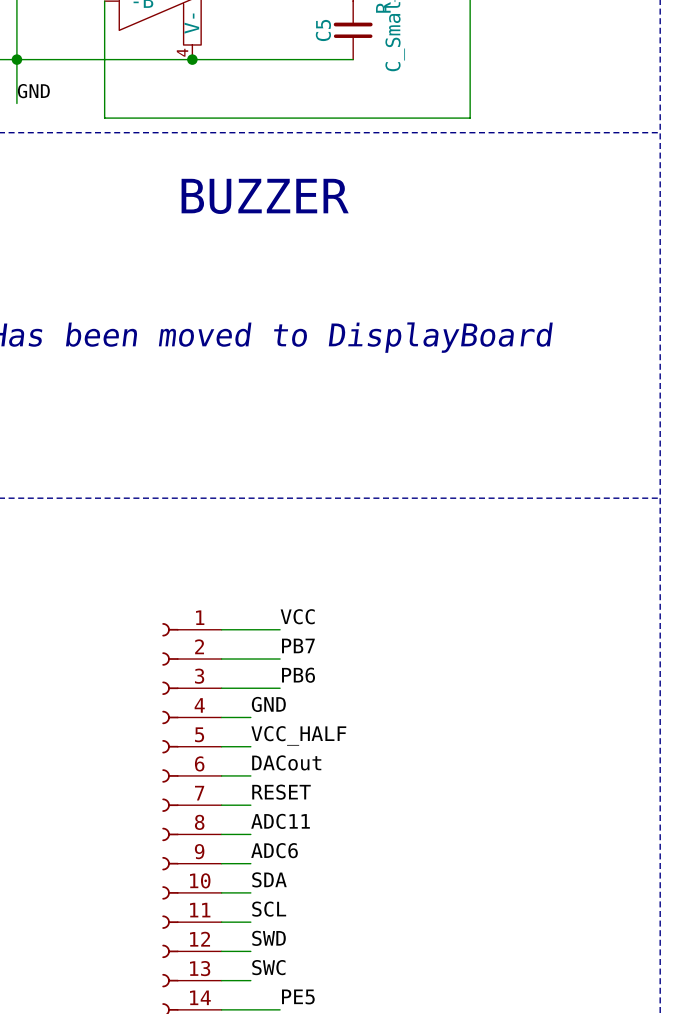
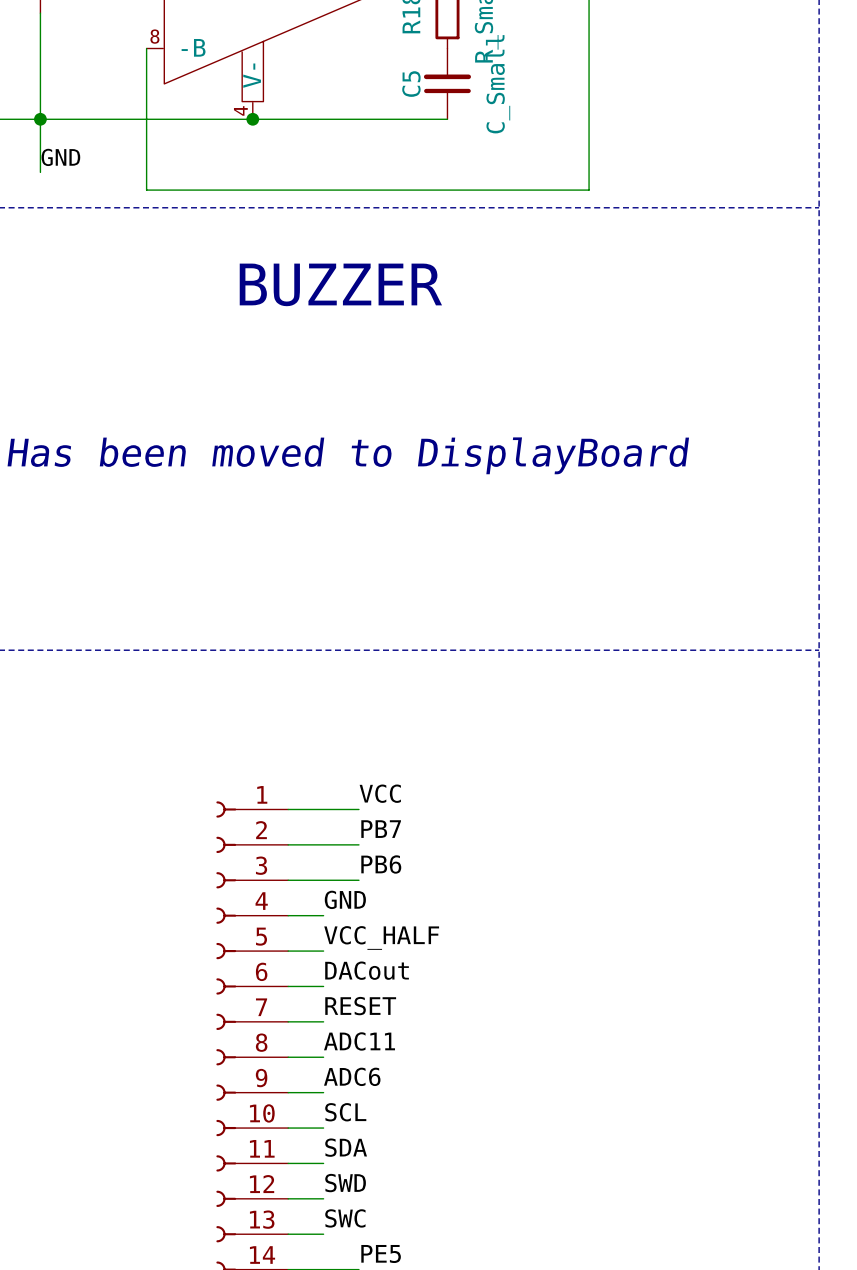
label: SDA (269, 879) -> SCL (345, 1112)
label: SCL (269, 909) -> SDA (346, 1147)

